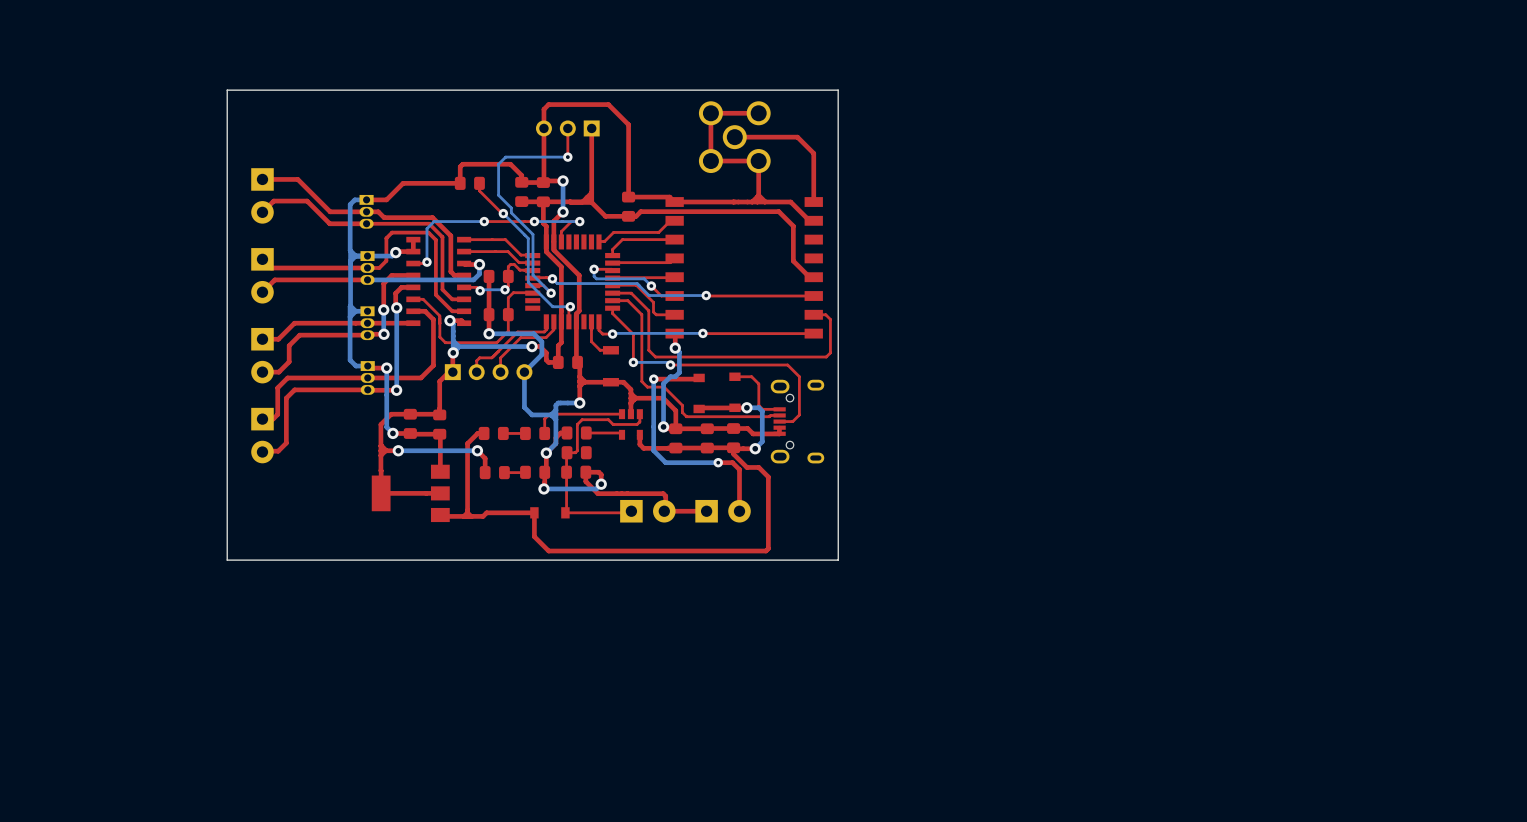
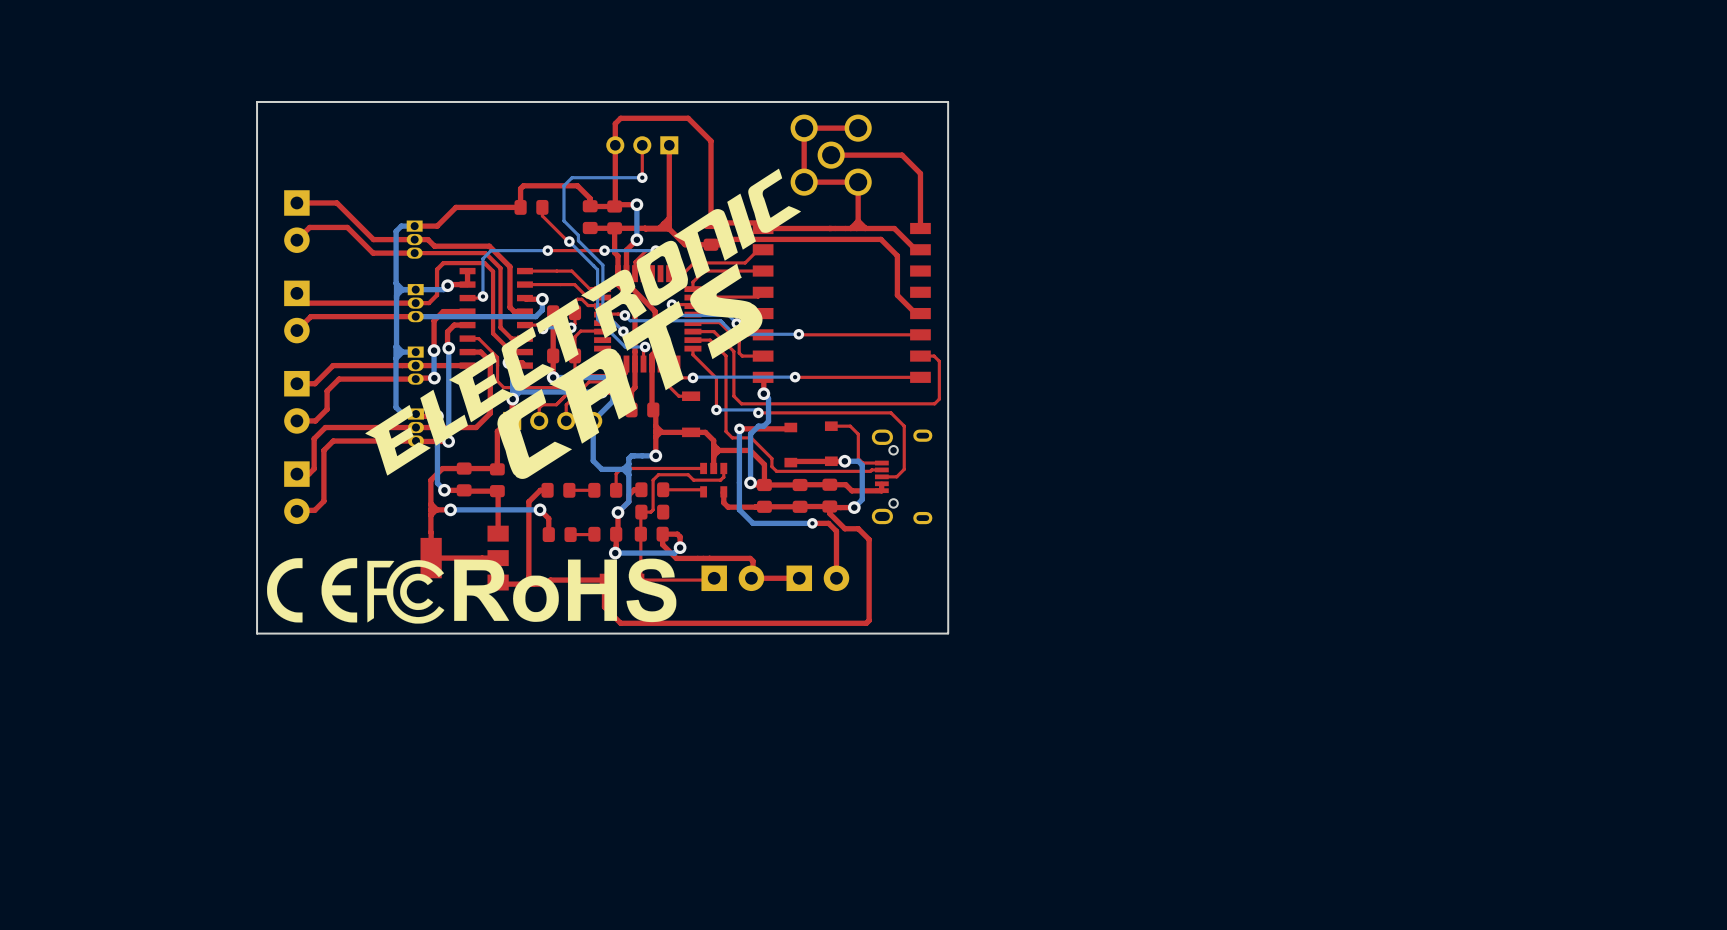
drawing: none -> [365, 168, 802, 479]
drawing: none -> [267, 558, 677, 624]

